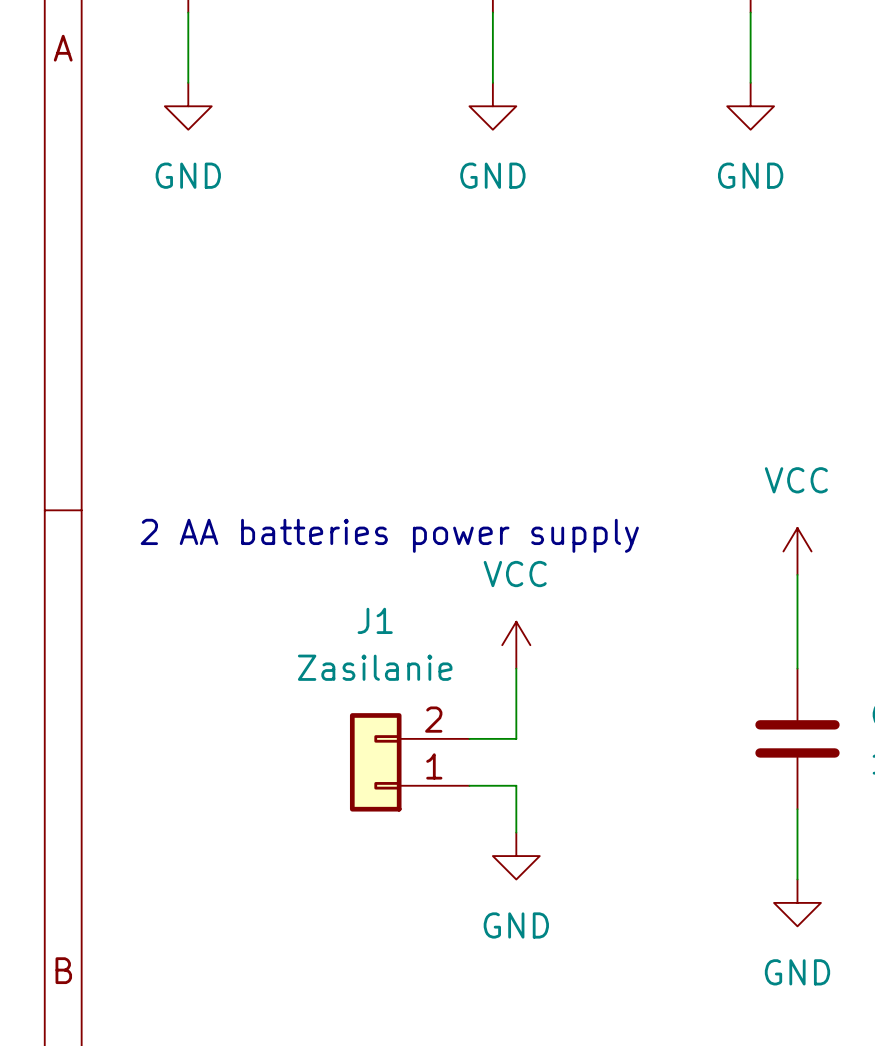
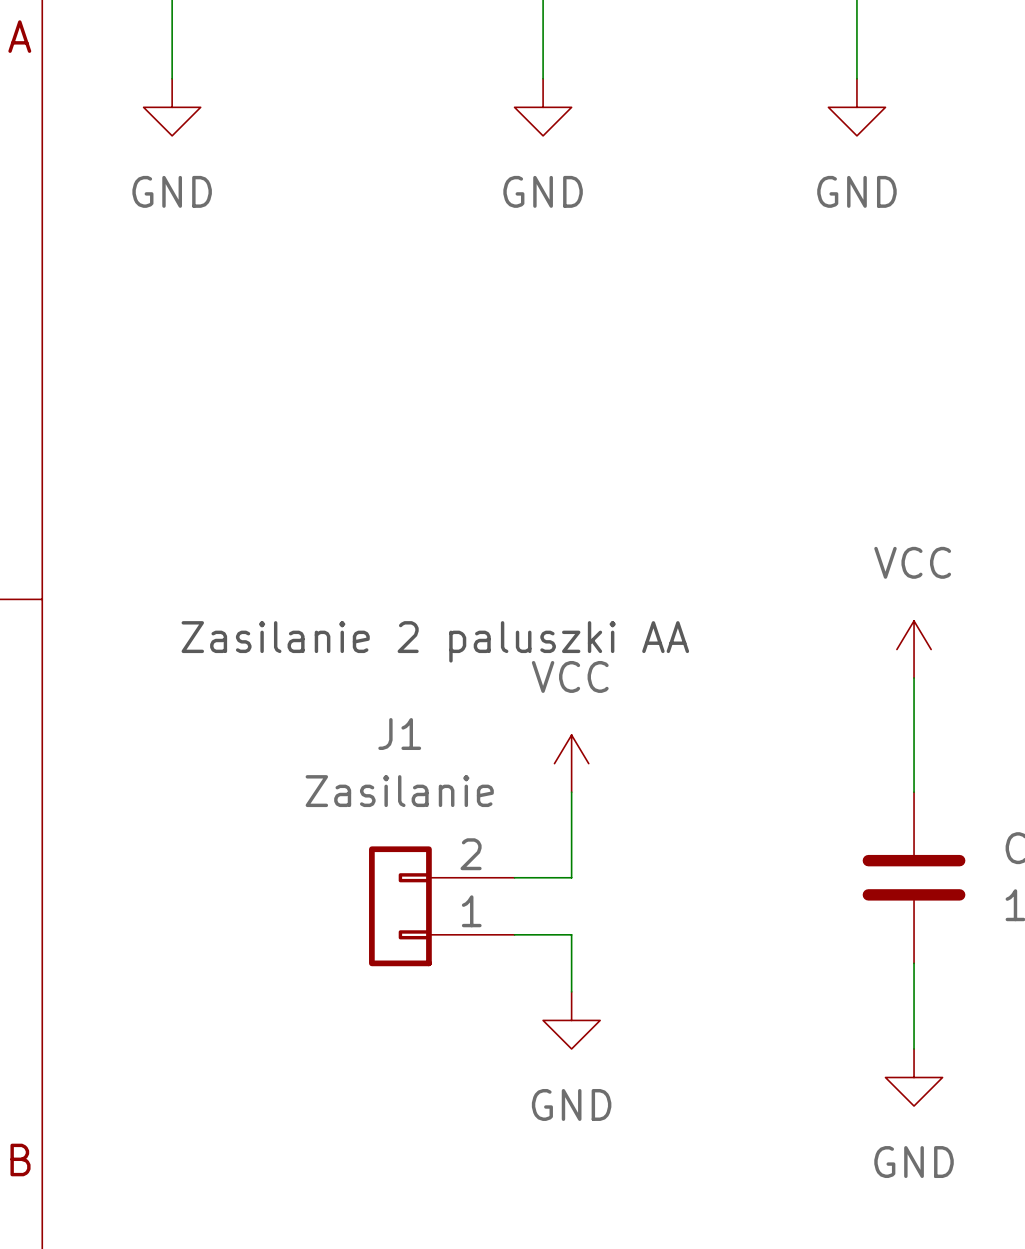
text: 2 AA batteries power supply (389, 535) -> Zasilanie 2 paluszki AA (435, 641)

